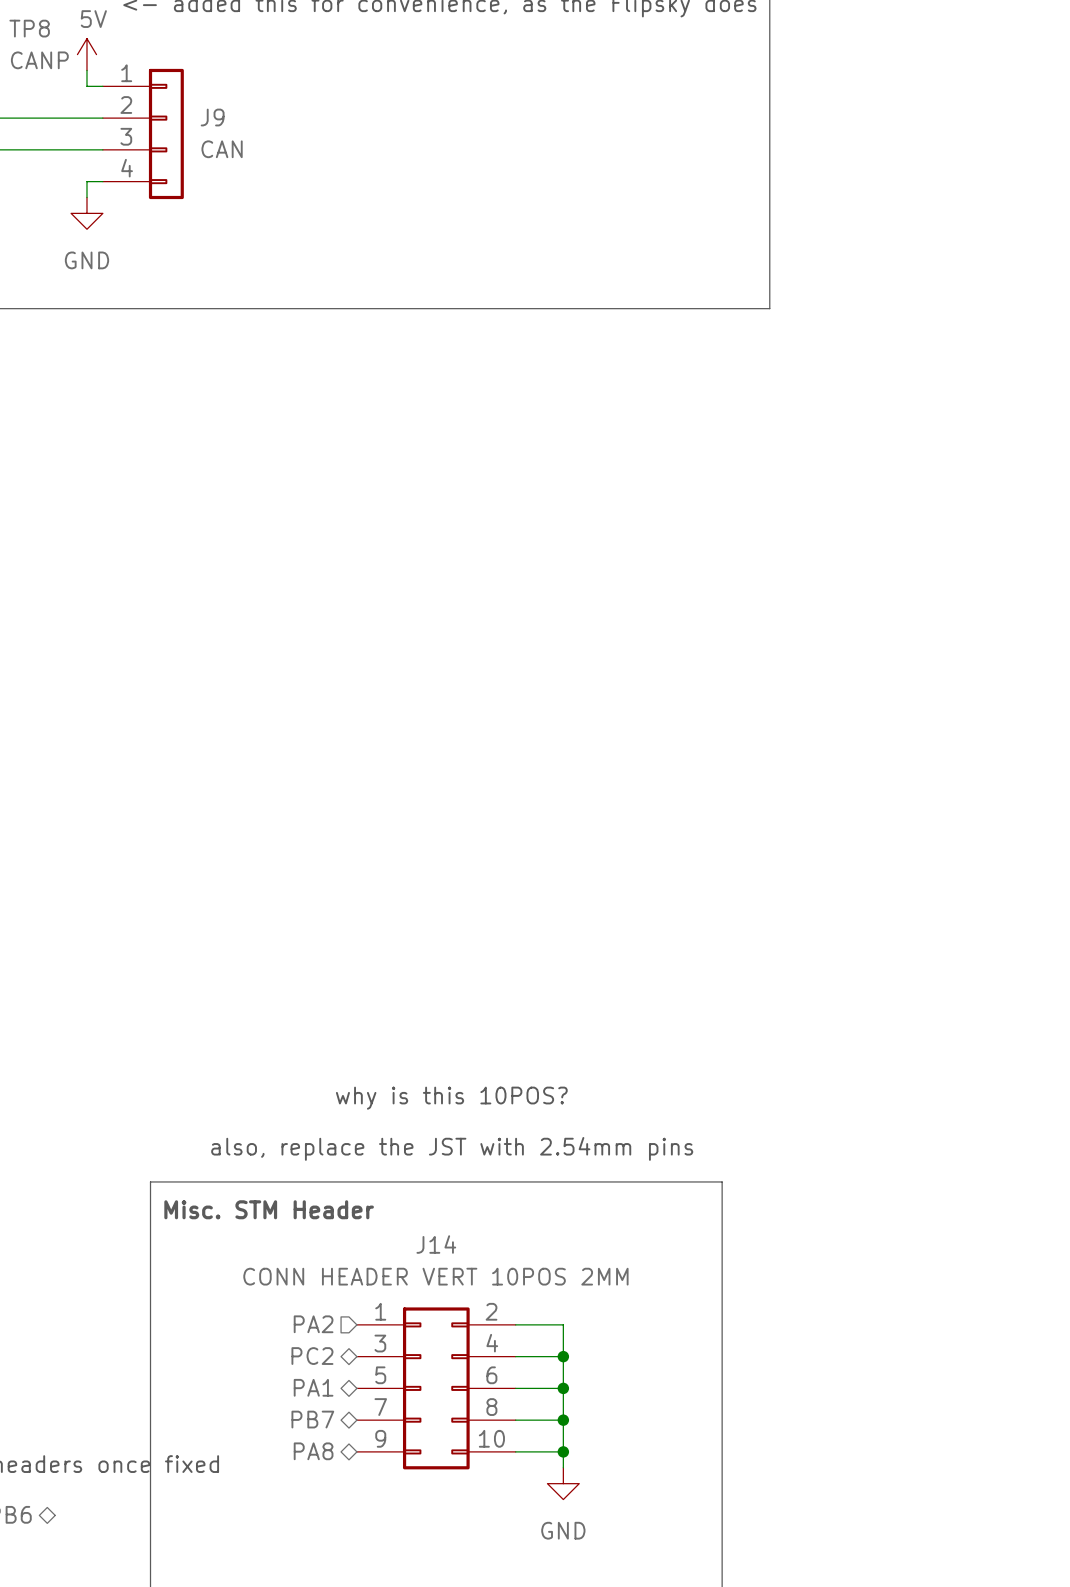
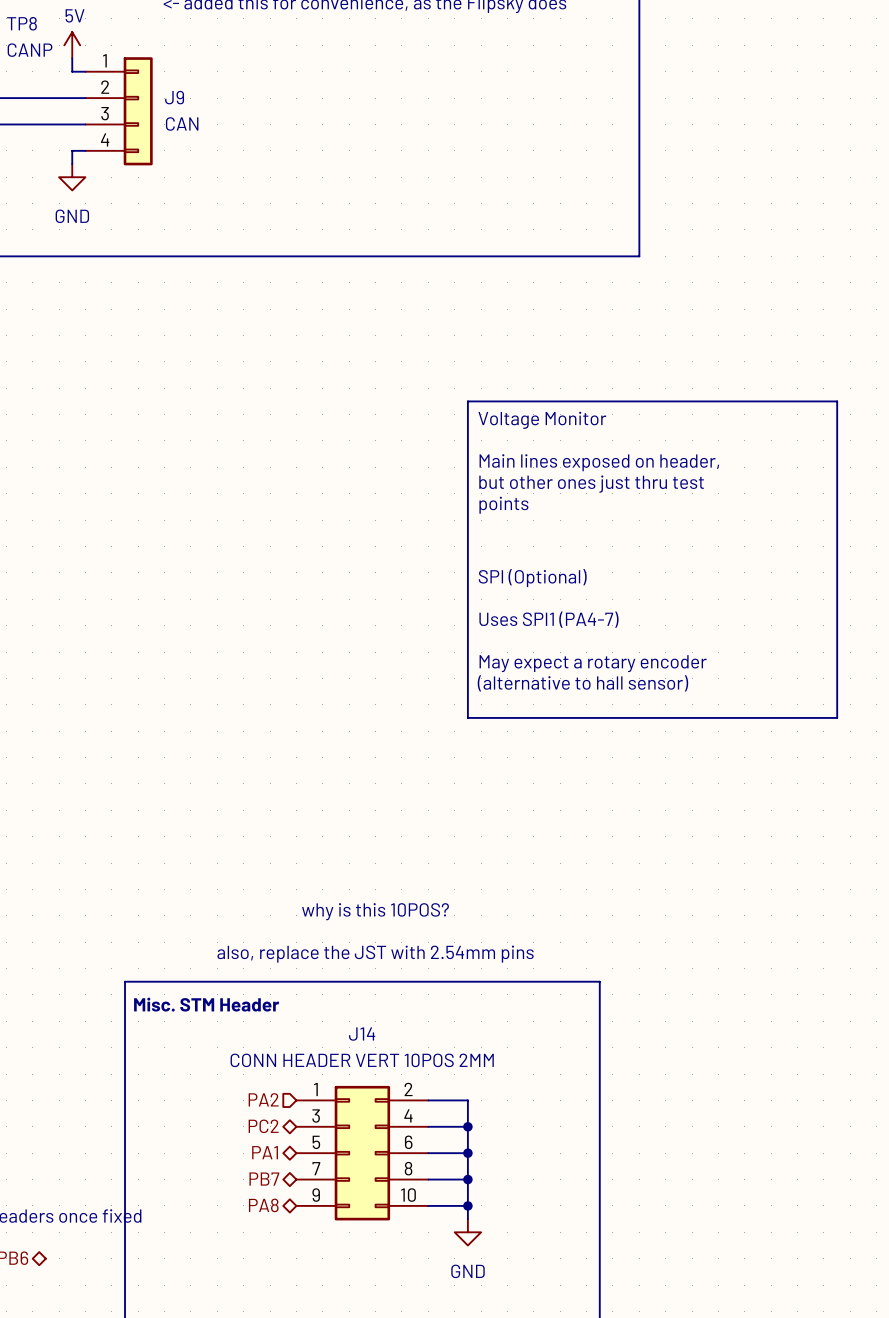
line: none -> (467, 401) (837, 401) (837, 717) (467, 717) (467, 401)
text: none -> Voltage Monitor (542, 420)
text: none -> Main lines exposed on header, (599, 462)
text: none -> but other ones just thru test (591, 484)
text: none -> points (503, 505)
text: none -> SPI (Optional) (532, 578)
text: none -> Uses SPI1 (PA4-7) (548, 619)
text: none -> May expect a rotary encoder (593, 663)
text: none -> (alternative to hall sensor) (582, 683)

